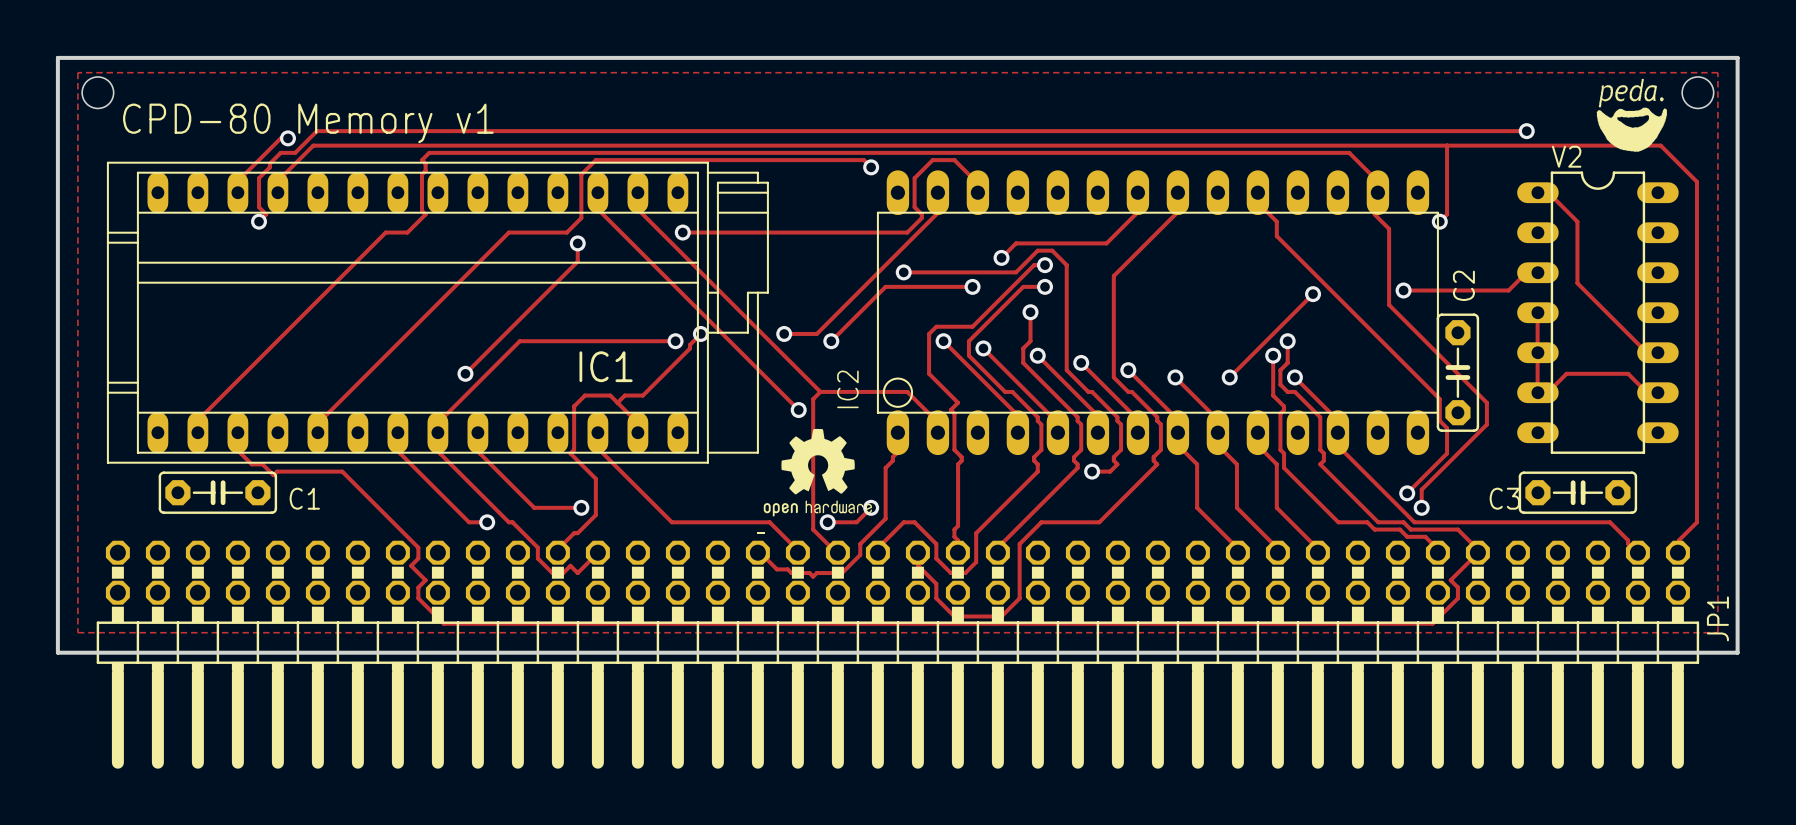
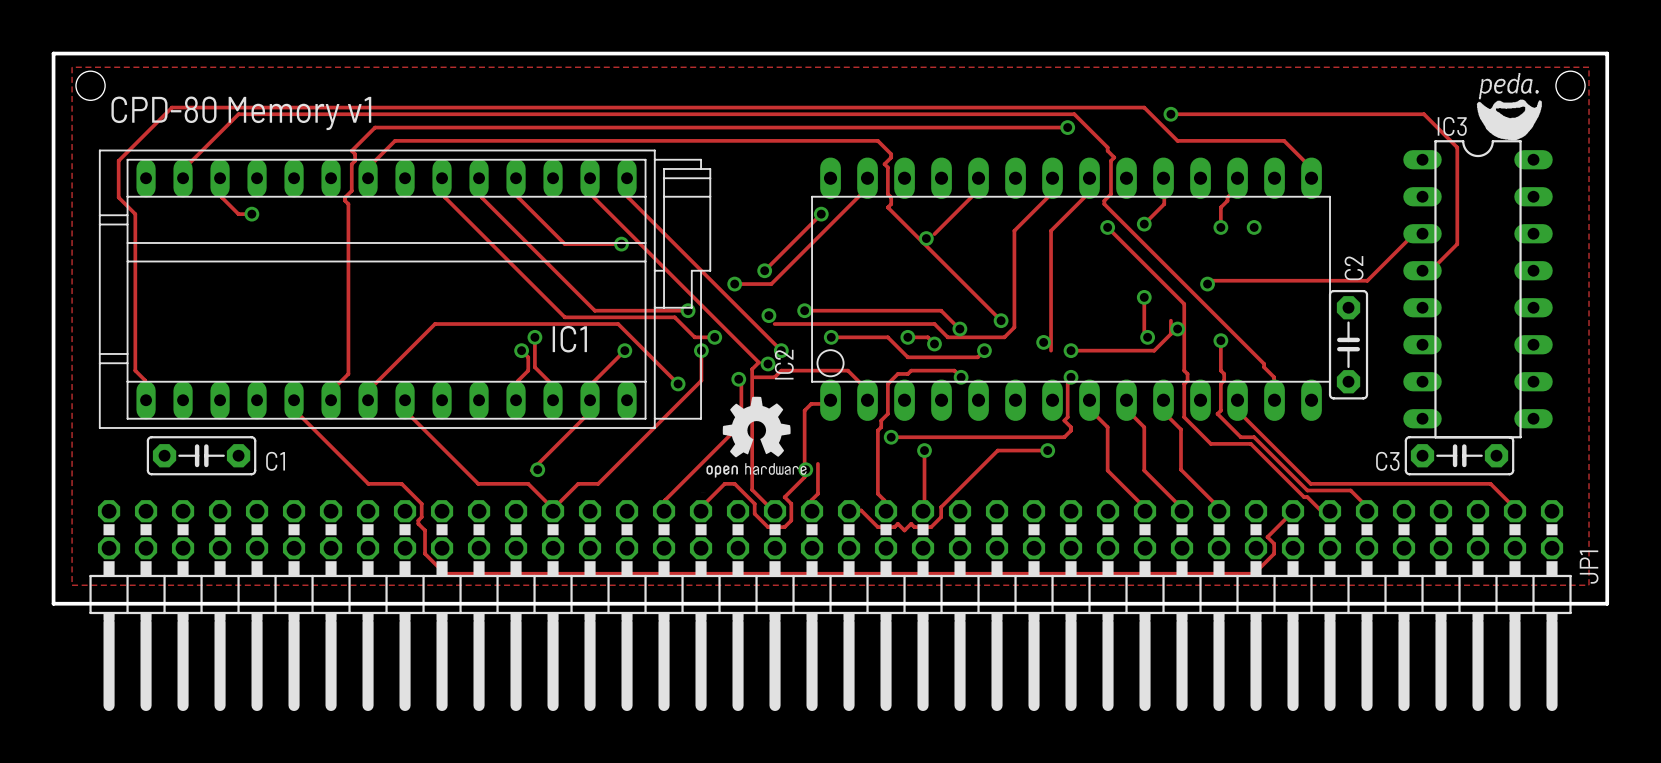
track: none -> (1170, 114) (1423, 114) (1457, 147) (1457, 244) (1430, 270) (1422, 270)
via: none -> (1170, 114)
track: (1526, 131) (316, 131) (295, 152) (280, 152) (259, 178) (259, 207) (266, 214) (259, 221) -> none
via: (1526, 131) -> none
track: none -> (1067, 127) (375, 127) (351, 150) (355, 154) (355, 160) (351, 164) (351, 190) (345, 197) (348, 204) (348, 373) (331, 390) (331, 400)
via: none -> (1067, 127)
track: (287, 138) (280, 138) (240, 178) (240, 192) (237, 192) -> (251, 214) (238, 214) (221, 197) (221, 180) (220, 178)
via: (287, 138) -> none
track: (1447, 145) (1447, 214) (1439, 221) -> none
track: (871, 167) (863, 160) (595, 160) (581, 174) (581, 218) (566, 232) (508, 232) (320, 420) (320, 431) (317, 432) -> (1293, 511) (1267, 537) (1274, 543) (1274, 553) (1254, 573) (445, 573) (425, 553) (425, 530) (418, 523) (421, 517) (421, 503) (401, 483) (368, 483) (295, 410) (294, 400)
via: (871, 167) -> none
track: none -> (183, 178) (185, 177) (185, 167) (238, 114) (1074, 114) (1107, 147) (1107, 150) (1114, 157) (1110, 160) (1110, 194) (1104, 200) (1104, 204) (1264, 363) (1264, 367) (1274, 377) (1274, 400)
track: (277, 192) (280, 192) (280, 178) (313, 145) (1660, 145) (1696, 181) (1696, 522) (1678, 540) (1677, 552) -> none
track: none -> (368, 178) (368, 167) (395, 140) (877, 140) (891, 154) (891, 157) (884, 164) (887, 167) (887, 194) (891, 197) (891, 204) (887, 207) (1001, 320)
track: none -> (442, 178) (445, 180) (445, 197) (564, 317) (674, 317) (694, 337) (714, 337)
track: none -> (479, 178) (481, 180) (481, 197) (594, 310) (688, 310)
track: none -> (516, 178) (518, 180) (518, 197) (564, 244) (621, 244)
track: (597, 192) (599, 192) (599, 210) (798, 410) -> none
track: none -> (627, 178) (628, 197) (781, 350)
track: (937, 192) (936, 192) (936, 214) (816, 333) (784, 333) -> (867, 178) (864, 180) (864, 190) (771, 284) (734, 284)
track: (977, 192) (976, 192) (976, 181) (954, 160) (932, 160) (914, 178) (914, 207) (921, 214) (921, 218) (907, 232) (682, 232) -> none
track: none -> (978, 178) (977, 190) (934, 234)
track: (1137, 192) (1135, 192) (1135, 214) (1106, 243) (1016, 243) (1001, 257) -> (1052, 178) (1051, 194) (1014, 230) (1014, 327) (1004, 337) (947, 337) (934, 324) (774, 324)
track: (1177, 192) (1175, 192) (1175, 214) (1113, 276) (1113, 377) (1128, 391) (1131, 391) (1157, 417) (1157, 420) (1160, 424) (1160, 449) (1153, 457) (1153, 460) (1157, 464) (1099, 522) (1041, 522) (1019, 544) (1019, 598) (1001, 616) (954, 616) (936, 598) (936, 583) (918, 565) (917, 552) -> (1089, 178) (1087, 180) (1087, 194) (1051, 230) (1051, 350)
track: none -> (1237, 178) (1237, 187) (1220, 207) (1220, 227)
track: none -> (1311, 178) (1310, 167) (1284, 140) (1177, 140) (1144, 107) (171, 107) (118, 160) (118, 197) (135, 214) (135, 370) (145, 380) (146, 400)
track: (1537, 192) (1548, 192) (1577, 221) (1577, 283) (1646, 352) (1657, 352) -> none
track: (1258, 203) (1276, 221) (1276, 236) (1439, 399) (1439, 420) (1447, 428) (1447, 453) (1407, 493) -> (1164, 188) (1164, 204) (1144, 224)
via position: (259, 221) -> (251, 214)
via: (1439, 221) -> none
track: none -> (821, 214) (764, 270)
via: none -> (821, 214)
via position: (682, 232) -> (621, 244)
via: none -> (1144, 224)
track: (577, 243) (577, 261) (465, 373) -> none
via: (577, 243) -> none
via: none -> (1107, 227)
via: none -> (1220, 227)
via: none -> (1254, 227)
track: none -> (1422, 233) (1414, 234) (1367, 280) (1210, 280) (1207, 284)
track: (1045, 265) (1034, 265) (972, 326) (936, 326) (929, 333) (929, 373) (958, 402) (950, 410) (954, 413) (954, 449) (961, 457) (961, 460) (958, 464) (958, 525) (954, 529) (954, 536) (958, 540) (957, 552) -> (961, 377) (954, 370) (911, 370) (907, 373) (897, 373) (887, 383) (887, 413) (881, 420) (881, 427) (877, 430) (877, 493) (884, 500) (886, 511)
via: (1045, 265) -> none
track: (903, 272) (1016, 272) (1037, 250) (1052, 250) (1066, 265) (1066, 370) (1117, 417) (1117, 420) (1121, 424) (1121, 449) (1113, 457) (1113, 460) (1117, 464) (1110, 471) (1092, 471) -> none
via: (903, 272) -> none
track: (1537, 272) (1537, 276) (1523, 276) (1508, 290) (1403, 290) -> none
track: (972, 286) (885, 286) (831, 341) -> none
via: (972, 286) -> none
track: (1045, 286) (1023, 286) (968, 341) (968, 355) (1005, 391) (1012, 391) (1037, 417) (1037, 420) (1041, 424) (1041, 449) (1034, 457) (1034, 460) (1037, 464) (1037, 471) (976, 533) (976, 562) (965, 573) (950, 573) (936, 558) (936, 544) (914, 522) (903, 522) (874, 551) (877, 552) -> (817, 463) (817, 493) (811, 500) (812, 511)
via: (1045, 286) -> none
via: (1403, 290) -> none
via: none -> (764, 270)
track: (1313, 294) (1229, 377) -> none
via position: (1313, 294) -> (1207, 284)
via: none -> (734, 284)
track: (1030, 312) (1030, 341) (1023, 348) (1023, 362) (1077, 417) (1077, 420) (1081, 424) (1081, 449) (1073, 457) (1077, 467) (997, 547) (997, 552) -> (924, 450) (923, 511)
via: (1030, 312) -> none
track: (1537, 312) (1537, 392) (1548, 391) (1566, 373) (1628, 373) (1646, 391) (1657, 392) -> none
V2: (1597, 312) -> none
IC3: none -> (1478, 289)
track: none -> (1144, 297) (1144, 334) (1147, 337)
via: none -> (1144, 297)
track: (700, 333) (690, 344) (690, 348) (642, 395) (624, 395) (617, 402) -> none
via: (700, 333) -> none
via: (784, 333) -> none
via: none -> (688, 310)
track: none -> (804, 310) (941, 310) (954, 324)
via: none -> (804, 310)
track: (675, 341) (519, 341) (440, 420) (440, 431) (437, 432) (440, 435) (440, 453) (508, 522) (512, 522) (537, 547) (537, 558) (552, 573) (563, 573) (570, 565) (577, 573) (597, 552) -> none
via: (675, 341) -> none
track: (943, 341) (1016, 413) (1016, 431) (1017, 432) -> none
via: (943, 341) -> none
track: (1287, 341) (1287, 362) (1280, 370) (1280, 384) (1287, 391) (1294, 391) (1320, 417) (1320, 449) (1323, 453) (1323, 460) (1320, 464) (1378, 522) (1403, 522) (1410, 529) (1457, 529) (1479, 551) (1450, 580) (1457, 587) (1457, 598) (1432, 623) (443, 623) (418, 598) (418, 587) (425, 580) (411, 565) (418, 558) (418, 547) (342, 471) (277, 471) (273, 475) (262, 464) (251, 464) (240, 453) (240, 435) (237, 432) -> none
via: (1287, 341) -> none
via: none -> (1001, 320)
track: none -> (1170, 320) (1170, 334) (1154, 350) (1071, 350)
track: (983, 348) (1055, 420) (1055, 431) (1057, 432) -> none
via position: (983, 348) -> (907, 337)
track: (1037, 355) (1095, 413) (1095, 431) (1097, 432) -> none
track: (1273, 355) (1273, 395) (1284, 406) (1284, 410) (1280, 413) (1280, 449) (1284, 453) (1284, 467) (1338, 522) (1367, 522) (1374, 529) (1399, 529) (1407, 536) (1425, 536) (1439, 551) (1437, 552) -> (1107, 227) (1184, 304) (1184, 370) (1187, 373) (1187, 380) (1184, 383) (1184, 417) (1210, 443) (1250, 443) (1304, 497) (1307, 497) (1320, 510) (1330, 511)
track: (1081, 362) (1135, 417) (1135, 431) (1137, 432) -> none
via: (1081, 362) -> none
via: none -> (534, 337)
via: none -> (714, 337)
track: none -> (831, 337) (887, 337) (907, 357) (977, 357) (984, 350)
via: none -> (831, 337)
track: none -> (907, 337) (927, 337) (934, 344)
track: none -> (1220, 340) (1220, 370) (1224, 373) (1224, 380) (1220, 383) (1220, 410) (1217, 413) (1240, 437) (1254, 437) (1307, 490) (1350, 490) (1364, 503) (1364, 510) (1367, 511)
via: none -> (1220, 340)
track: (1128, 370) (1175, 417) (1175, 431) (1179, 435) (1179, 446) (1197, 464) (1197, 507) (1236, 547) (1237, 552) -> (1089, 400) (1091, 410) (1107, 427) (1107, 470) (1144, 507) (1145, 511)
via: none -> (934, 344)
via: (465, 373) -> none
track: (1175, 377) (1215, 417) (1215, 431) (1218, 435) (1218, 446) (1236, 464) (1236, 507) (1276, 547) (1277, 552) -> (1126, 400) (1127, 410) (1144, 427) (1144, 470) (1180, 507) (1182, 511)
via: (1175, 377) -> none
via position: (1229, 377) -> (1147, 337)
track: (1294, 377) (1334, 417) (1334, 431) (1337, 432) (1338, 446) (1414, 522) (1610, 522) (1637, 552) -> (1237, 400) (1237, 410) (1310, 483) (1490, 483) (1513, 507) (1515, 511)
via: (1294, 377) -> none
track: none -> (521, 350) (528, 357) (528, 370) (518, 380) (518, 397) (516, 400)
via: none -> (521, 350)
track: none -> (624, 350) (591, 383) (588, 413) (531, 470)
via: none -> (624, 350)
track: none -> (701, 350) (701, 380) (598, 483) (578, 483) (551, 510) (553, 511) (554, 510) (528, 483) (478, 483) (405, 410) (405, 400)
via: none -> (701, 350)
via: none -> (781, 350)
via: none -> (984, 350)
via: none -> (1071, 350)
track: (820, 391) (907, 391) (936, 420) (937, 432) -> (754, 377) (774, 377) (781, 370) (847, 370) (864, 387) (864, 397) (867, 400)
via: none -> (768, 363)
via: none -> (961, 377)
track: none -> (1071, 377) (1067, 383) (1067, 417) (1064, 420) (1071, 427) (1071, 430) (1064, 437) (891, 437)
via: none -> (1071, 377)
via: none -> (678, 383)
track: none -> (741, 383) (741, 423) (664, 500) (664, 511)
track: (197, 432) (201, 431) (201, 417) (385, 232) (407, 232) (425, 214) (422, 210) (422, 174) (425, 170) (425, 163) (422, 160) (429, 152) (1349, 152) (1374, 178) (1374, 214) (1389, 228) (1389, 304) (1486, 402) (1486, 424) (1421, 489) (1421, 507) -> none
track: (397, 432) (400, 435) (400, 453) (469, 522) (487, 522) -> (368, 400) (368, 390) (435, 324) (618, 324) (678, 383)
track: (477, 432) (479, 435) (479, 453) (534, 507) (581, 507) -> none
track: (597, 432) (599, 449) (671, 522) (769, 522) (798, 551) (797, 552) -> (553, 400) (551, 383) (534, 367) (534, 337)
track: (637, 432) (635, 431) (635, 420) (610, 395) (584, 395) (574, 406) (574, 449) (570, 453) (595, 478) (595, 515) (577, 533) (574, 533) (556, 551) (557, 552) -> none
track: (897, 432) (896, 453) (885, 467) (885, 518) (860, 544) (860, 554) (842, 573) (816, 573) (813, 576) (809, 573) (791, 573) (787, 569) (776, 569) (757, 552) -> (830, 400) (824, 403) (811, 403) (804, 410) (804, 477) (784, 497) (791, 503) (791, 520) (784, 527) (768, 527) (754, 513) (754, 503) (734, 483) (724, 483) (701, 507) (701, 511)
via: (1092, 471) -> none
via: none -> (891, 437)
via: none -> (924, 450)
track: none -> (1047, 450) (997, 450) (941, 507) (941, 517) (931, 527) (914, 527) (911, 523) (904, 530) (897, 523) (894, 527) (877, 527) (861, 510) (849, 511)
via: none -> (1047, 450)
via: (1407, 493) -> none
track: (871, 507) (856, 522) (827, 522) -> none
via: (1421, 507) -> none
via: (487, 522) -> none
via: (827, 522) -> none

